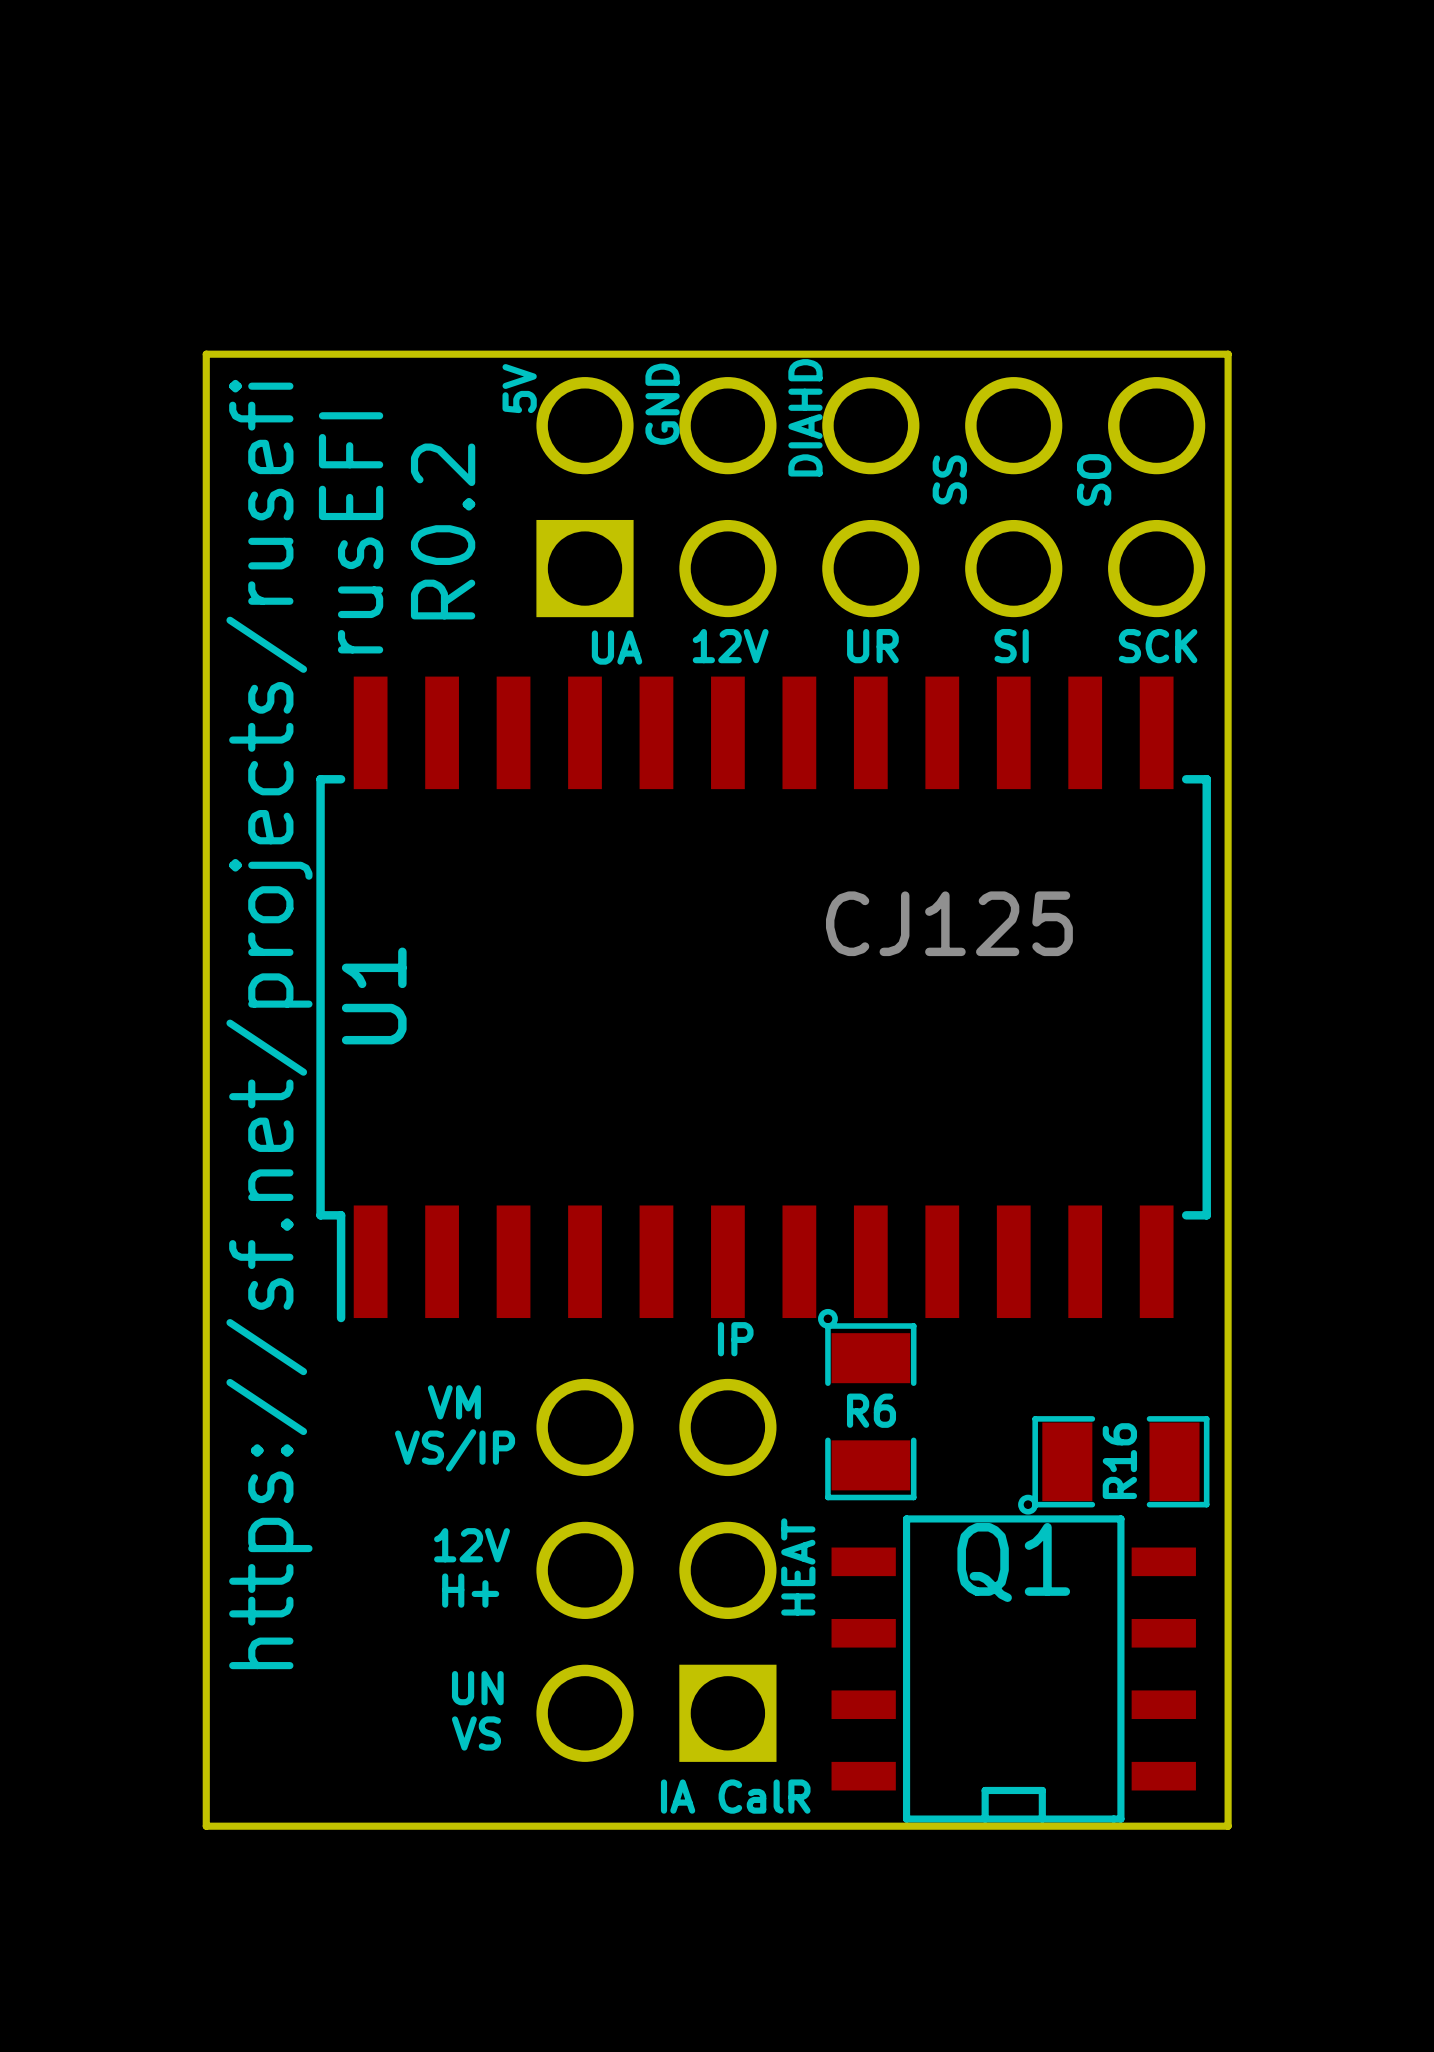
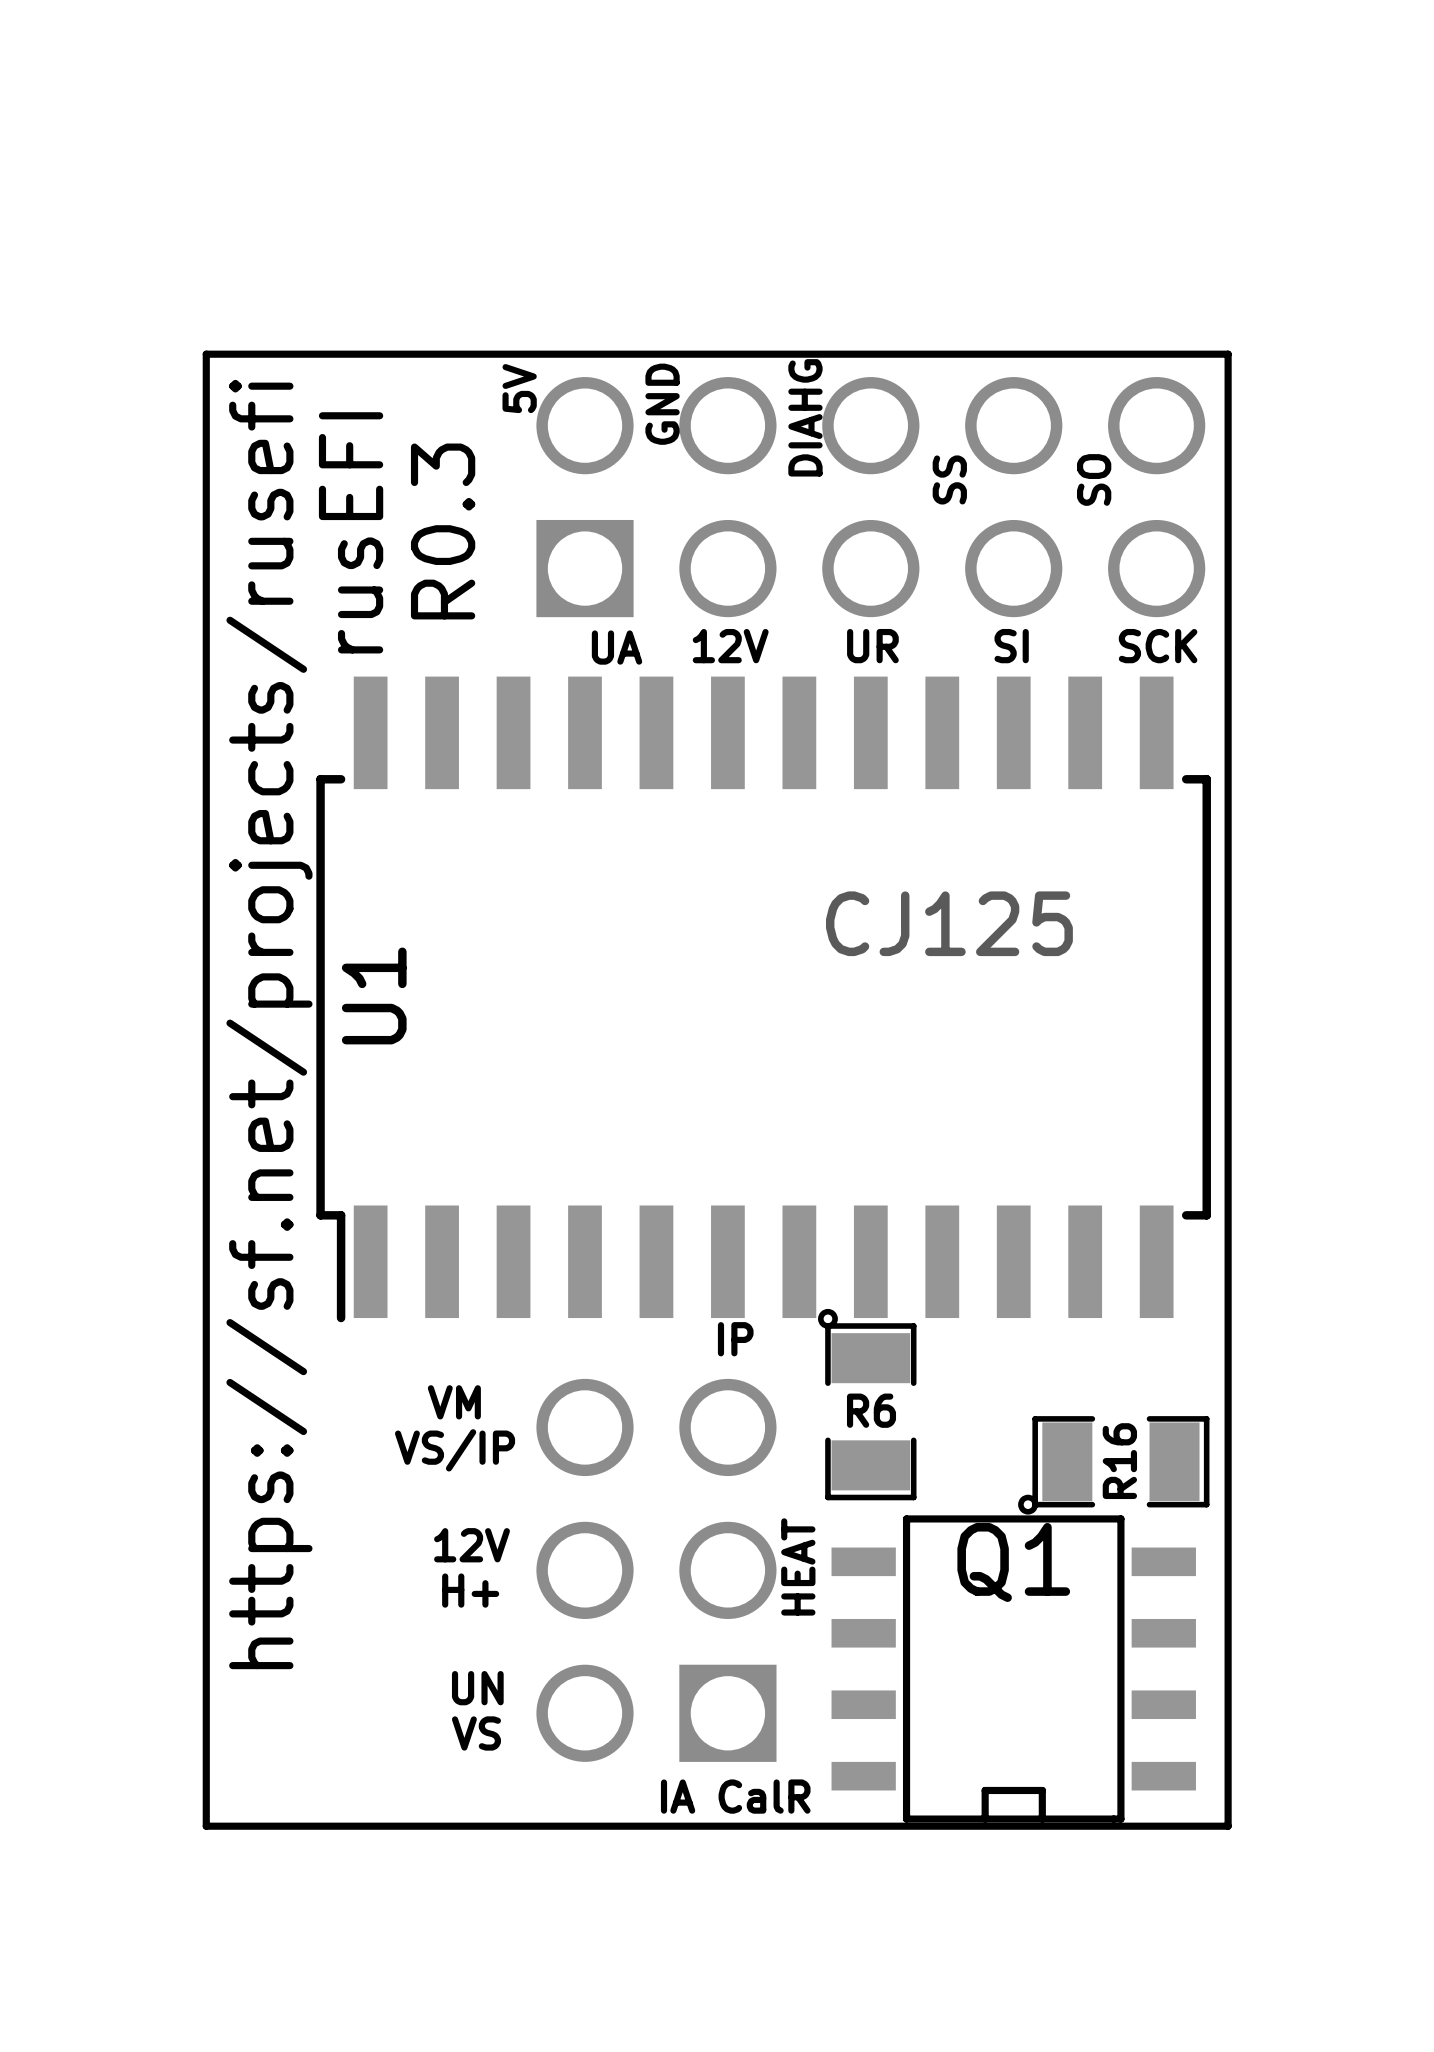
text: DIAHD (805, 417) -> DIAHG (805, 417)
text: R0.2 (443, 531) -> R0.3 (443, 531)

